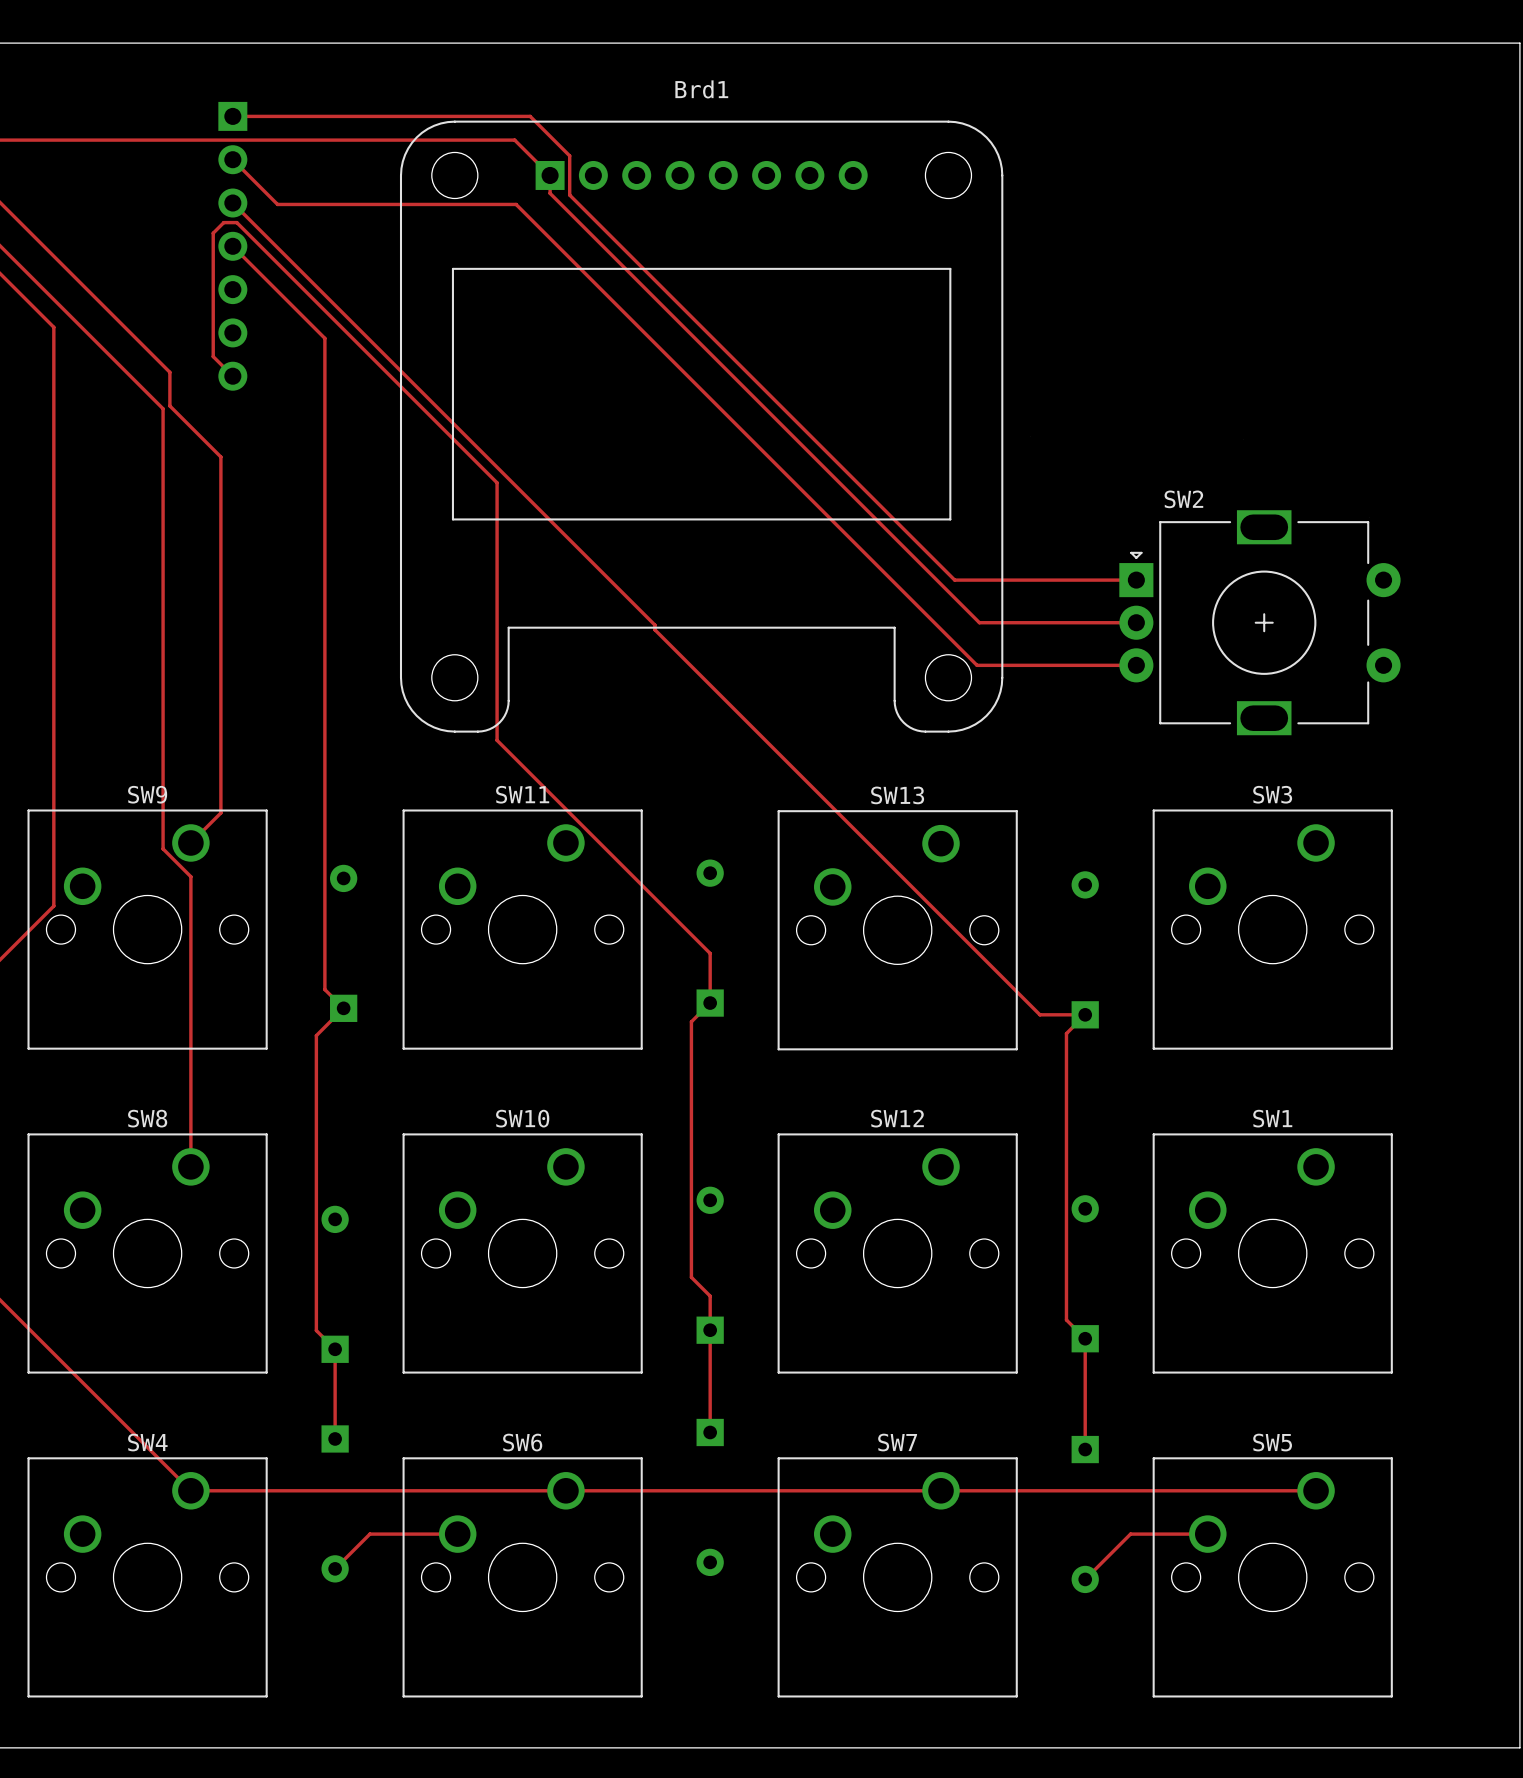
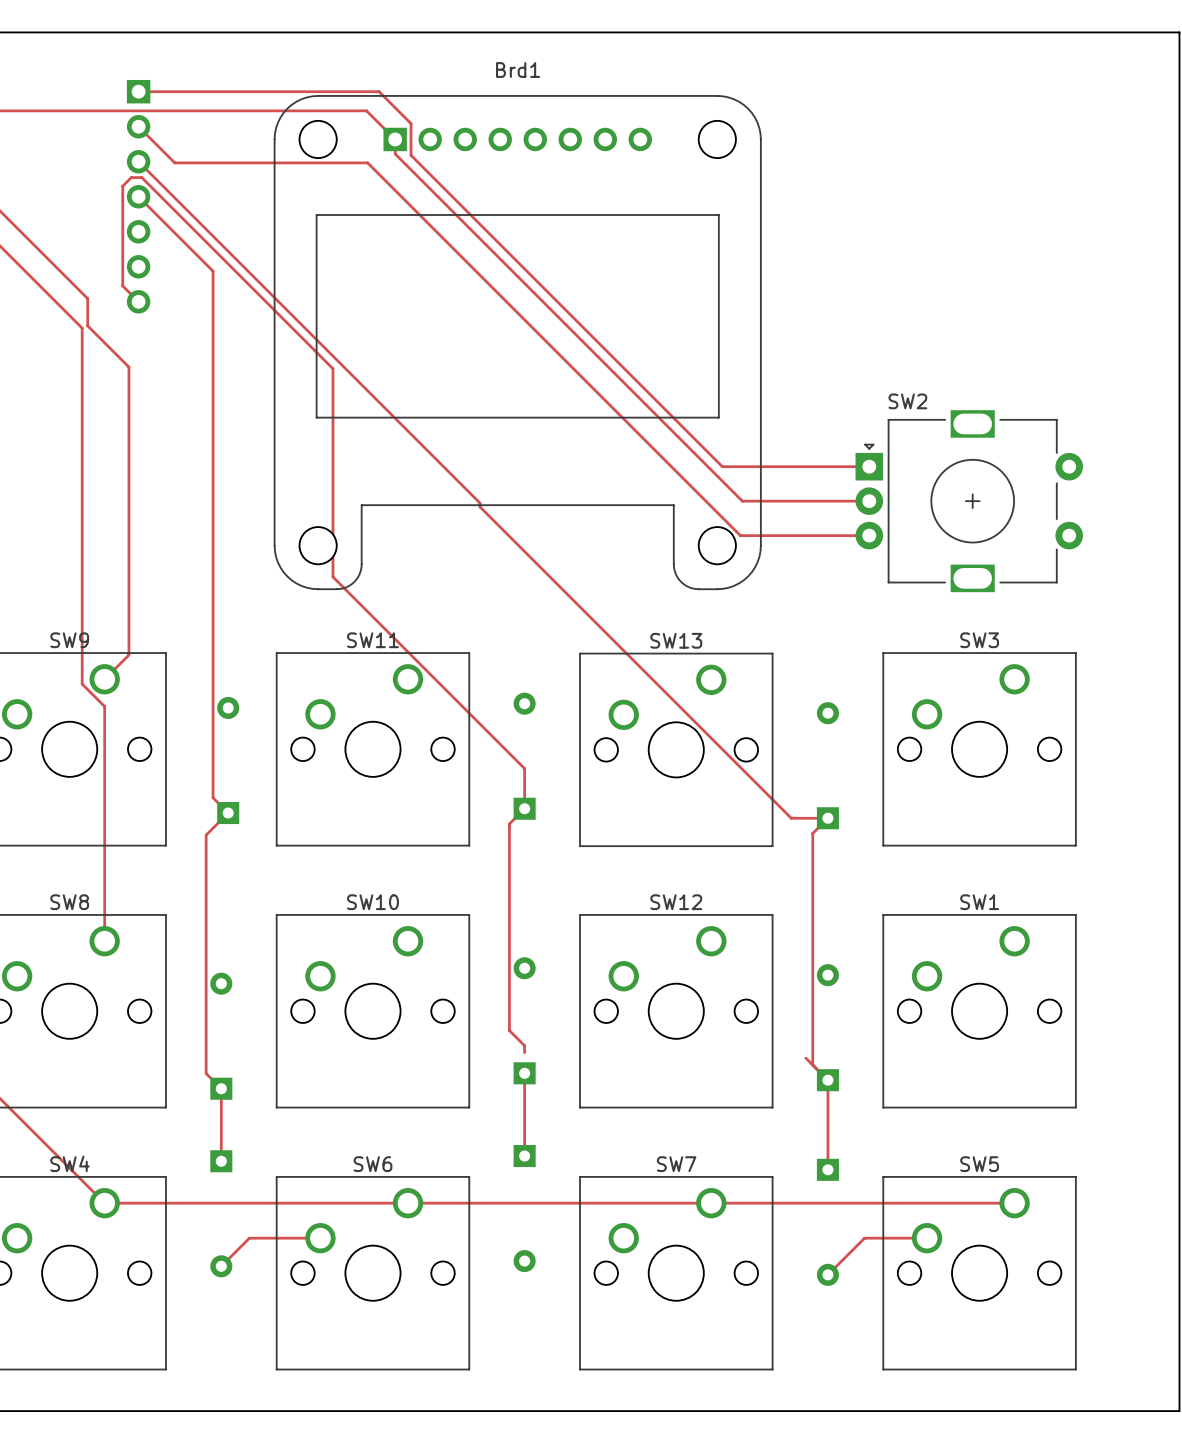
track: (473, 458) (497, 482) (497, 740) -> (332, 368) (332, 576) (352, 596)
track: (710, 1304) (710, 1330) -> none
track: none -> (805, 1058) (812, 1065)

